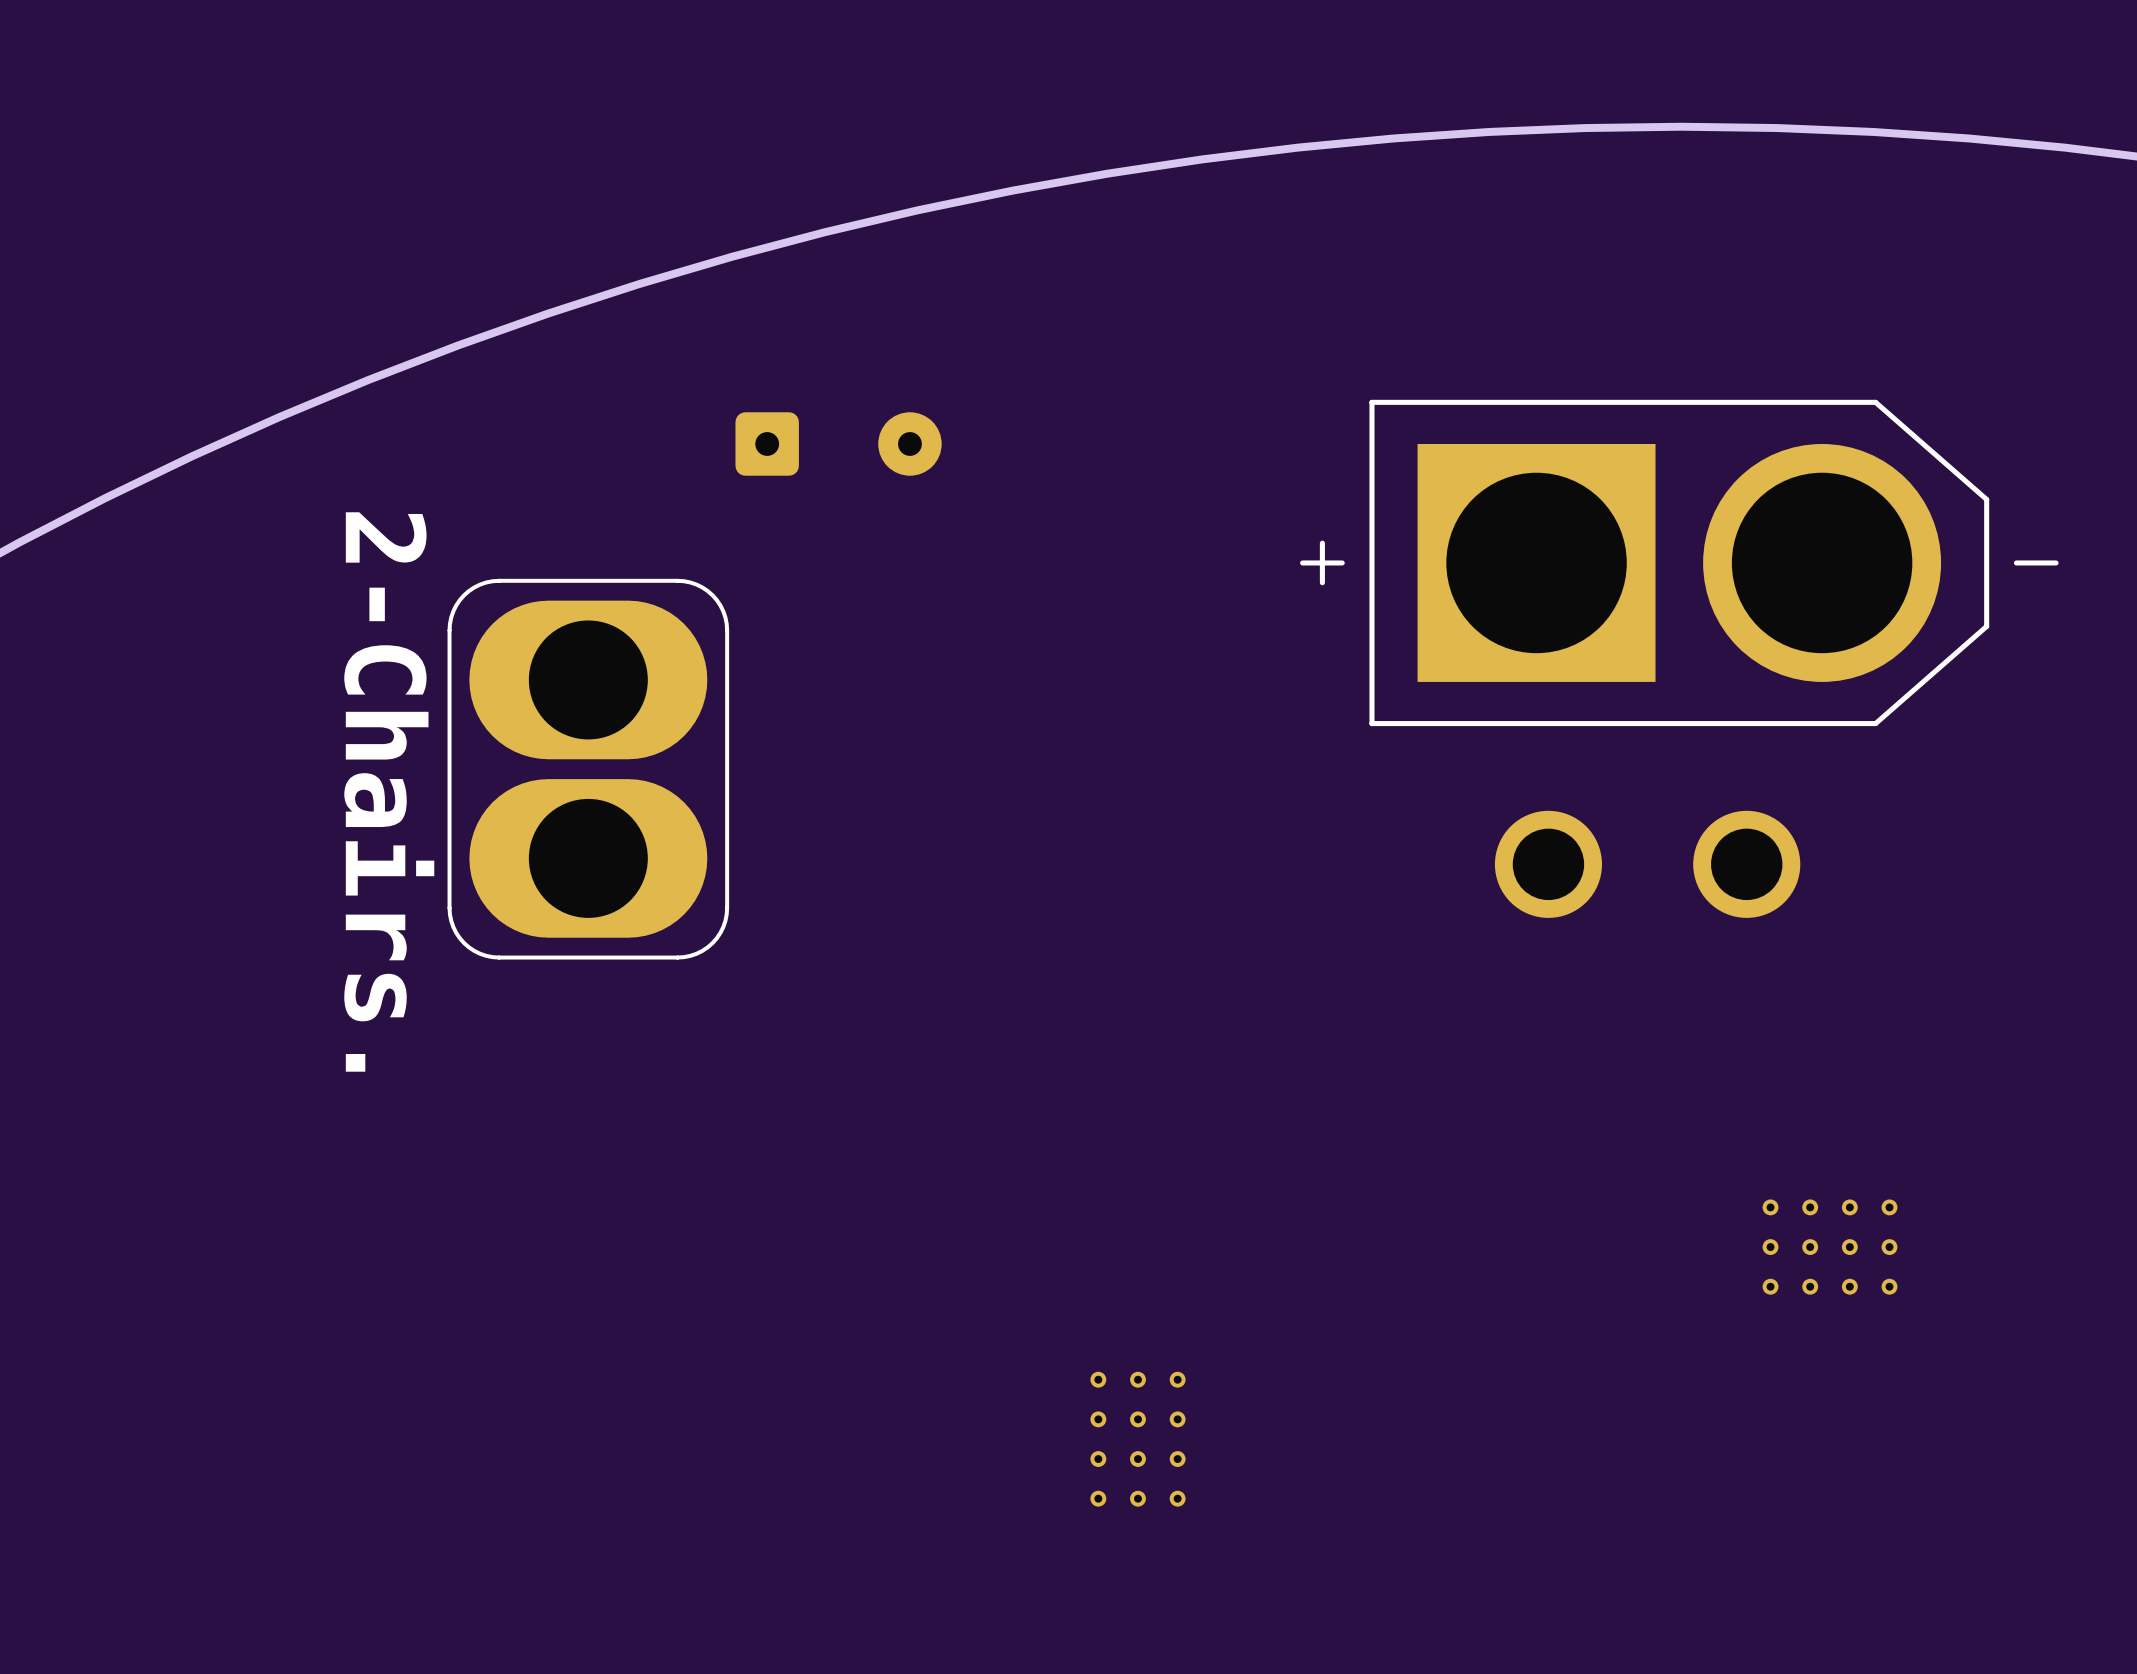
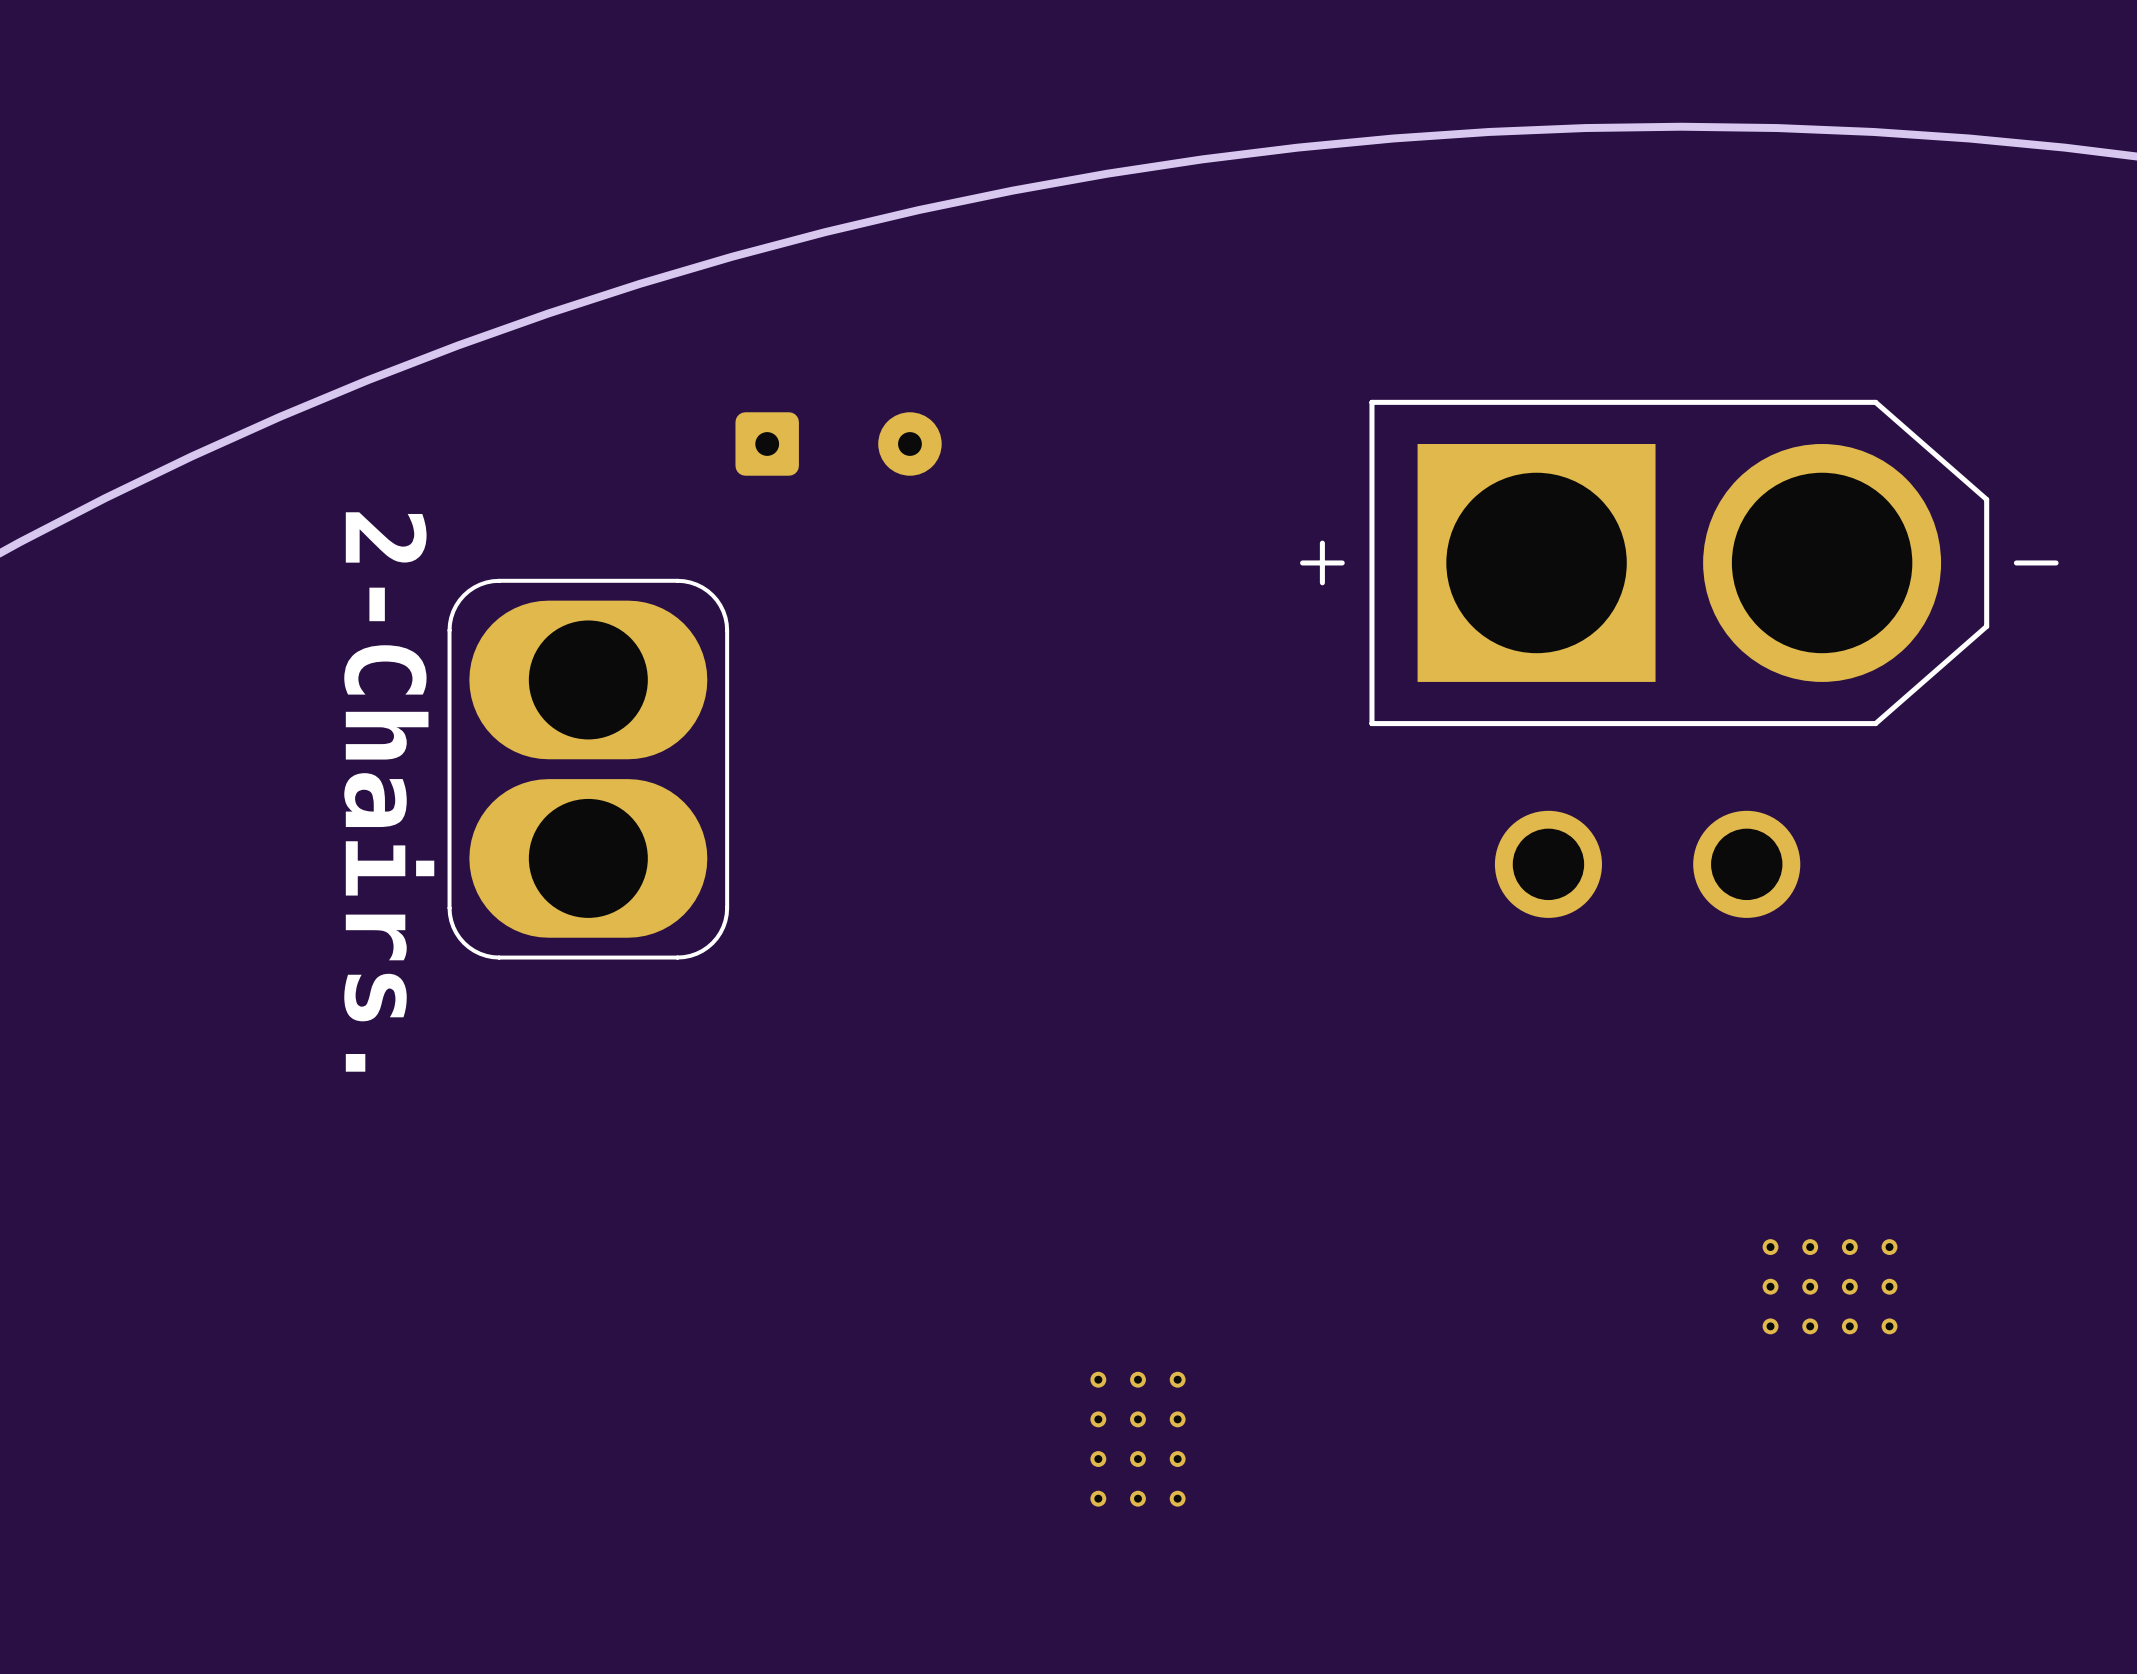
part position: (1830, 1247) -> (1830, 1286)

